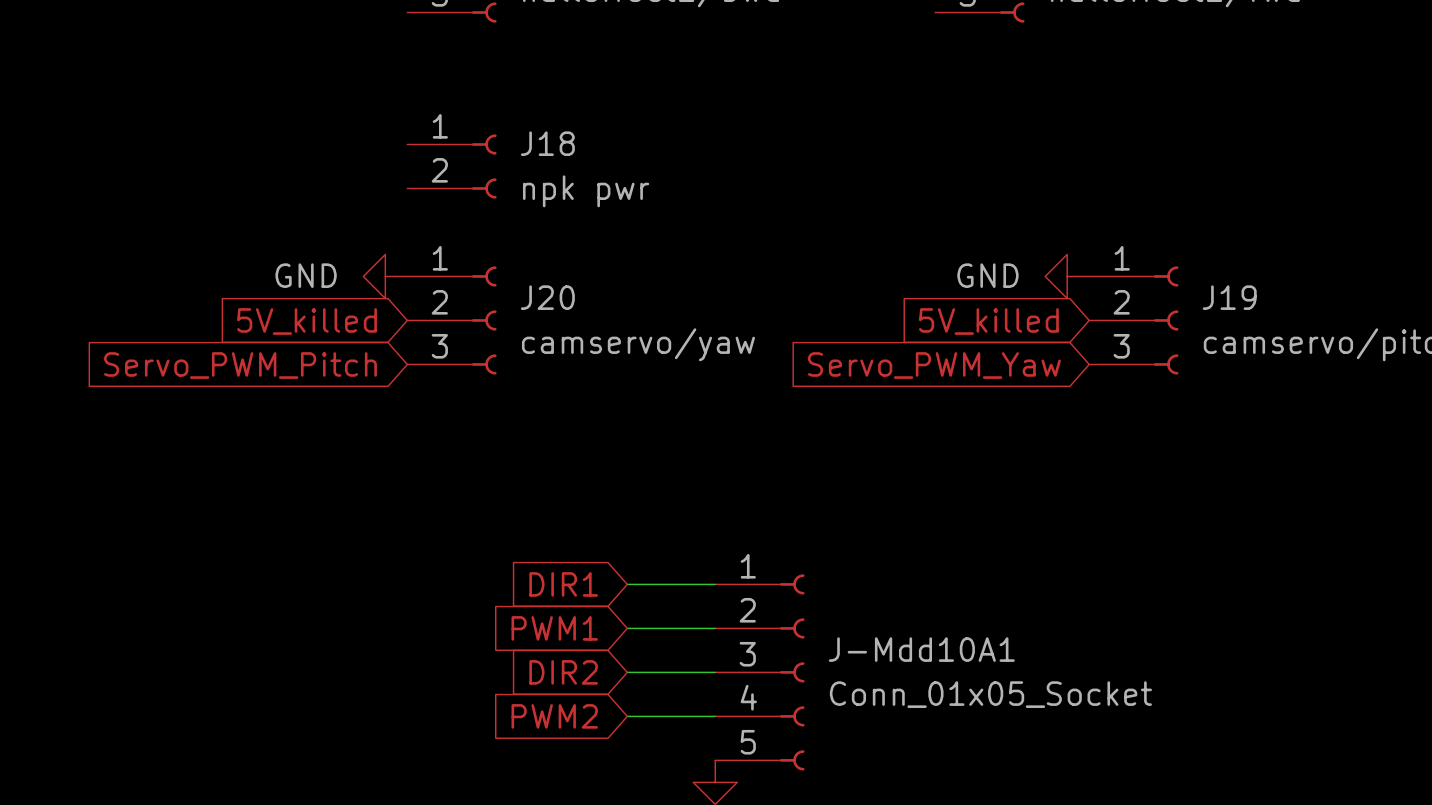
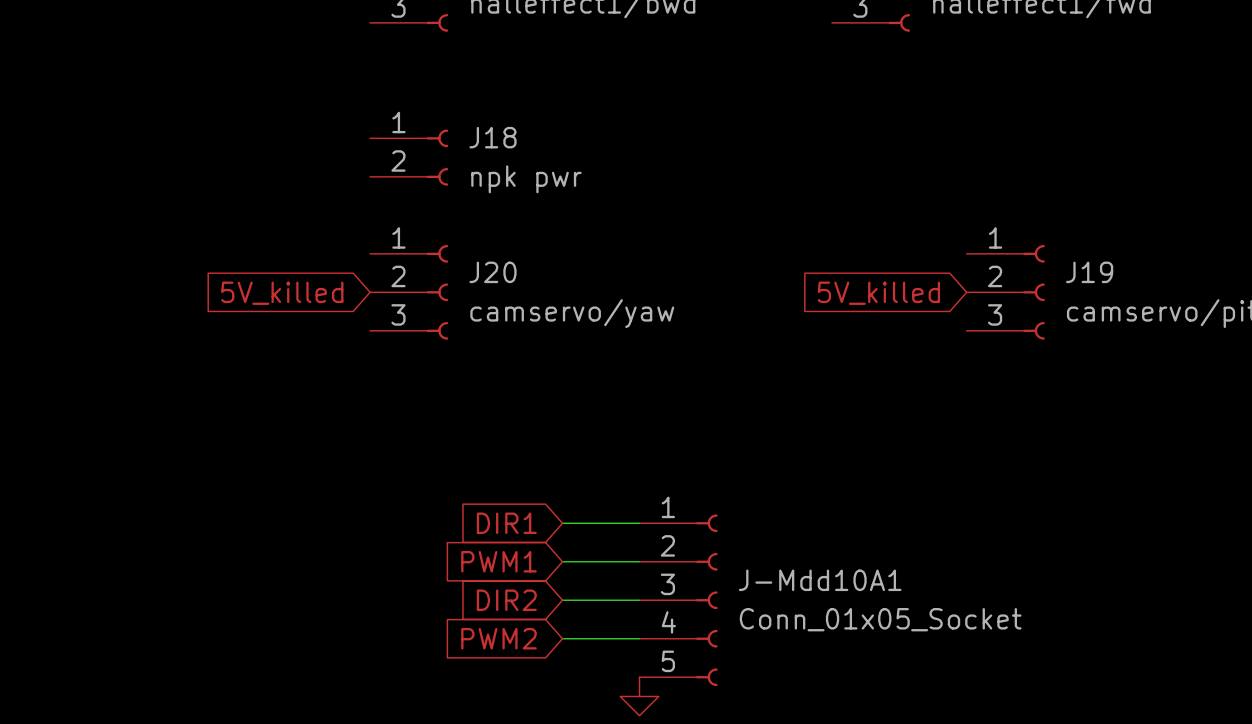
power symbol: GND (385, 276) -> none
power symbol: GND (1067, 276) -> none
global label: Servo_PWM_Pitch (240, 365) -> none
global label: Servo_PWM_Yaw (934, 365) -> none

